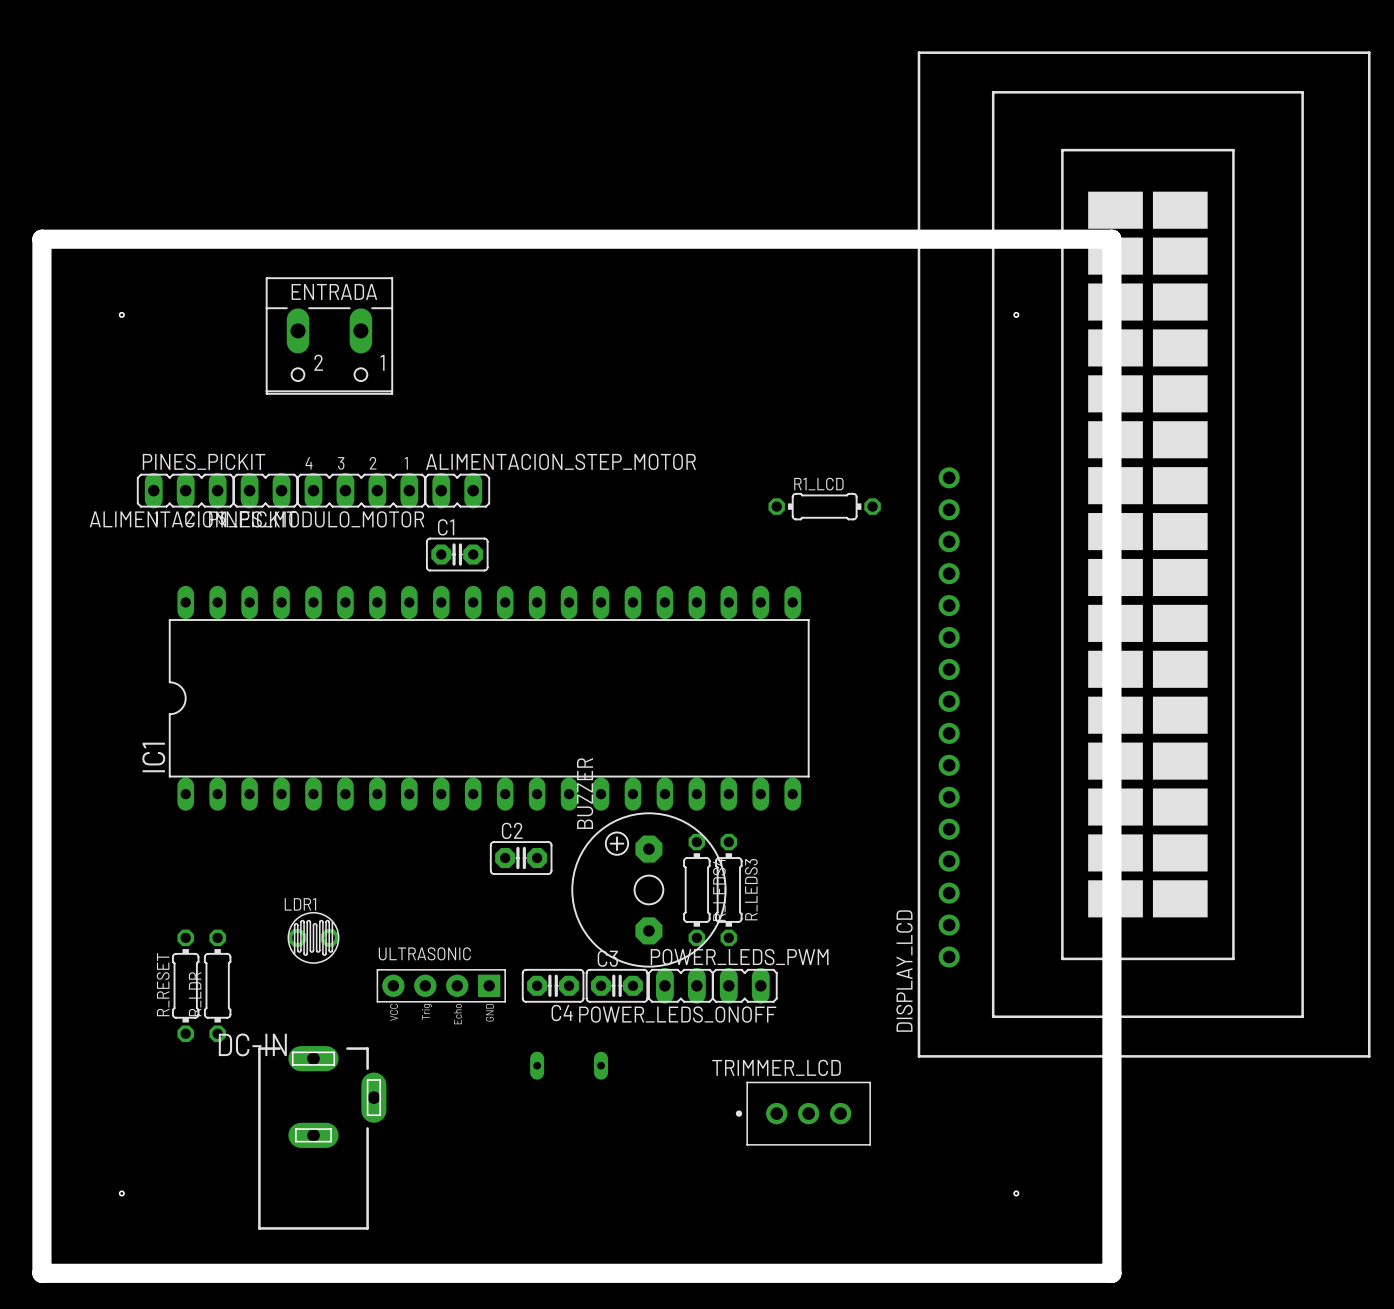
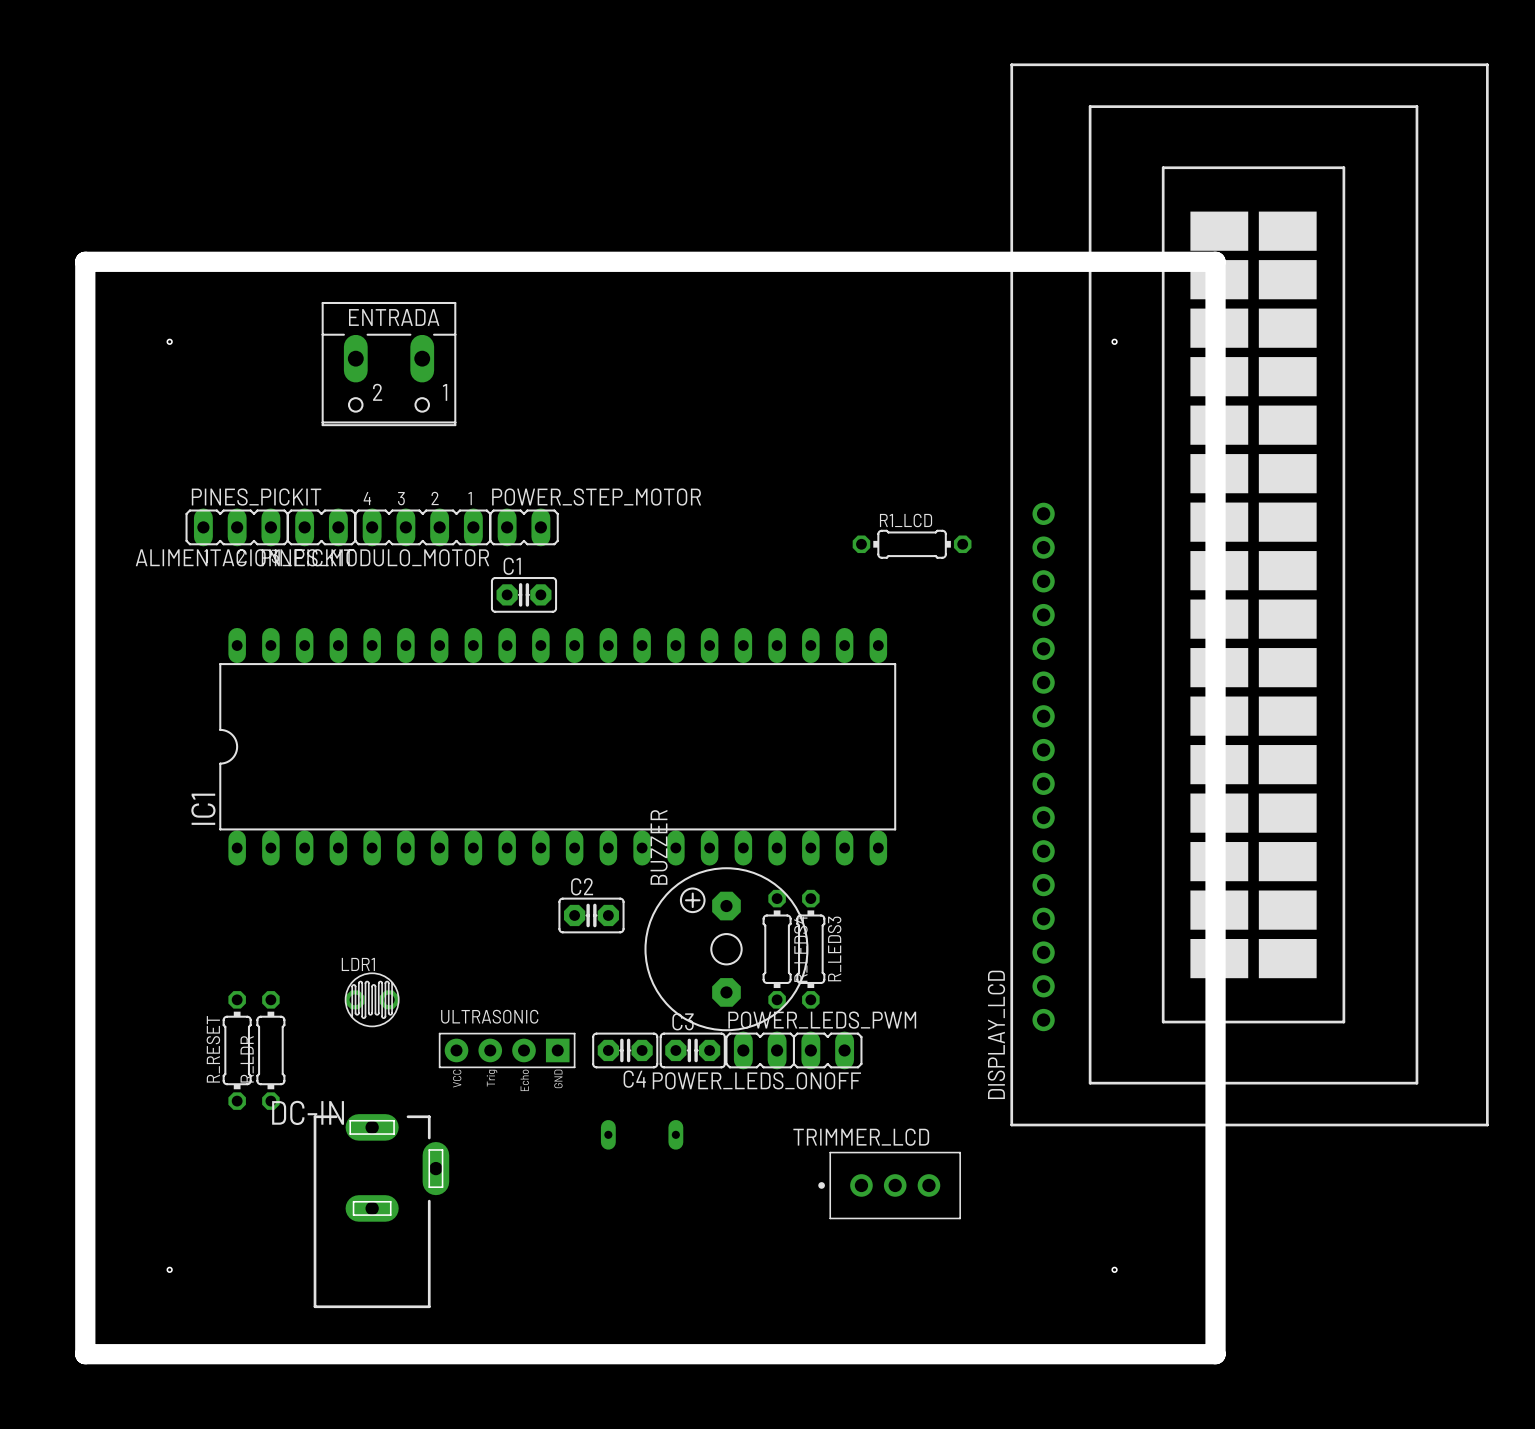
ALIMENTACION_STEP_MOTOR name: ALIMENTACION_STEP_MOTOR (560, 461) -> POWER_STEP_MOTOR (596, 497)

